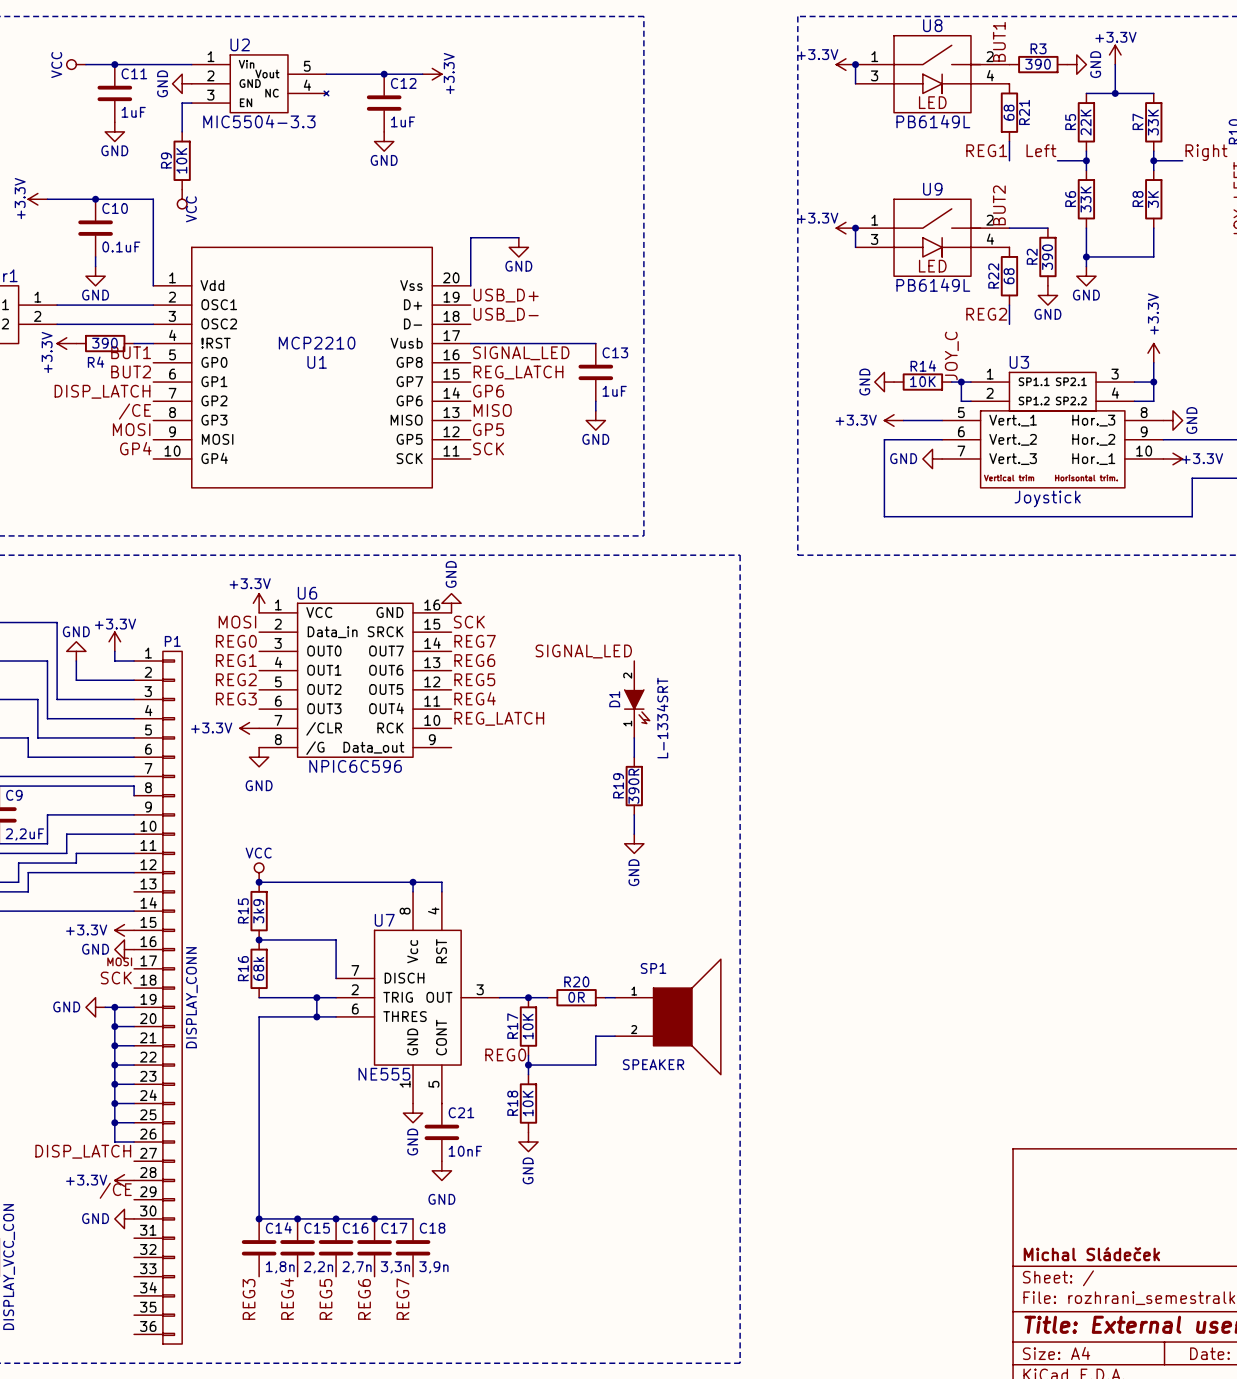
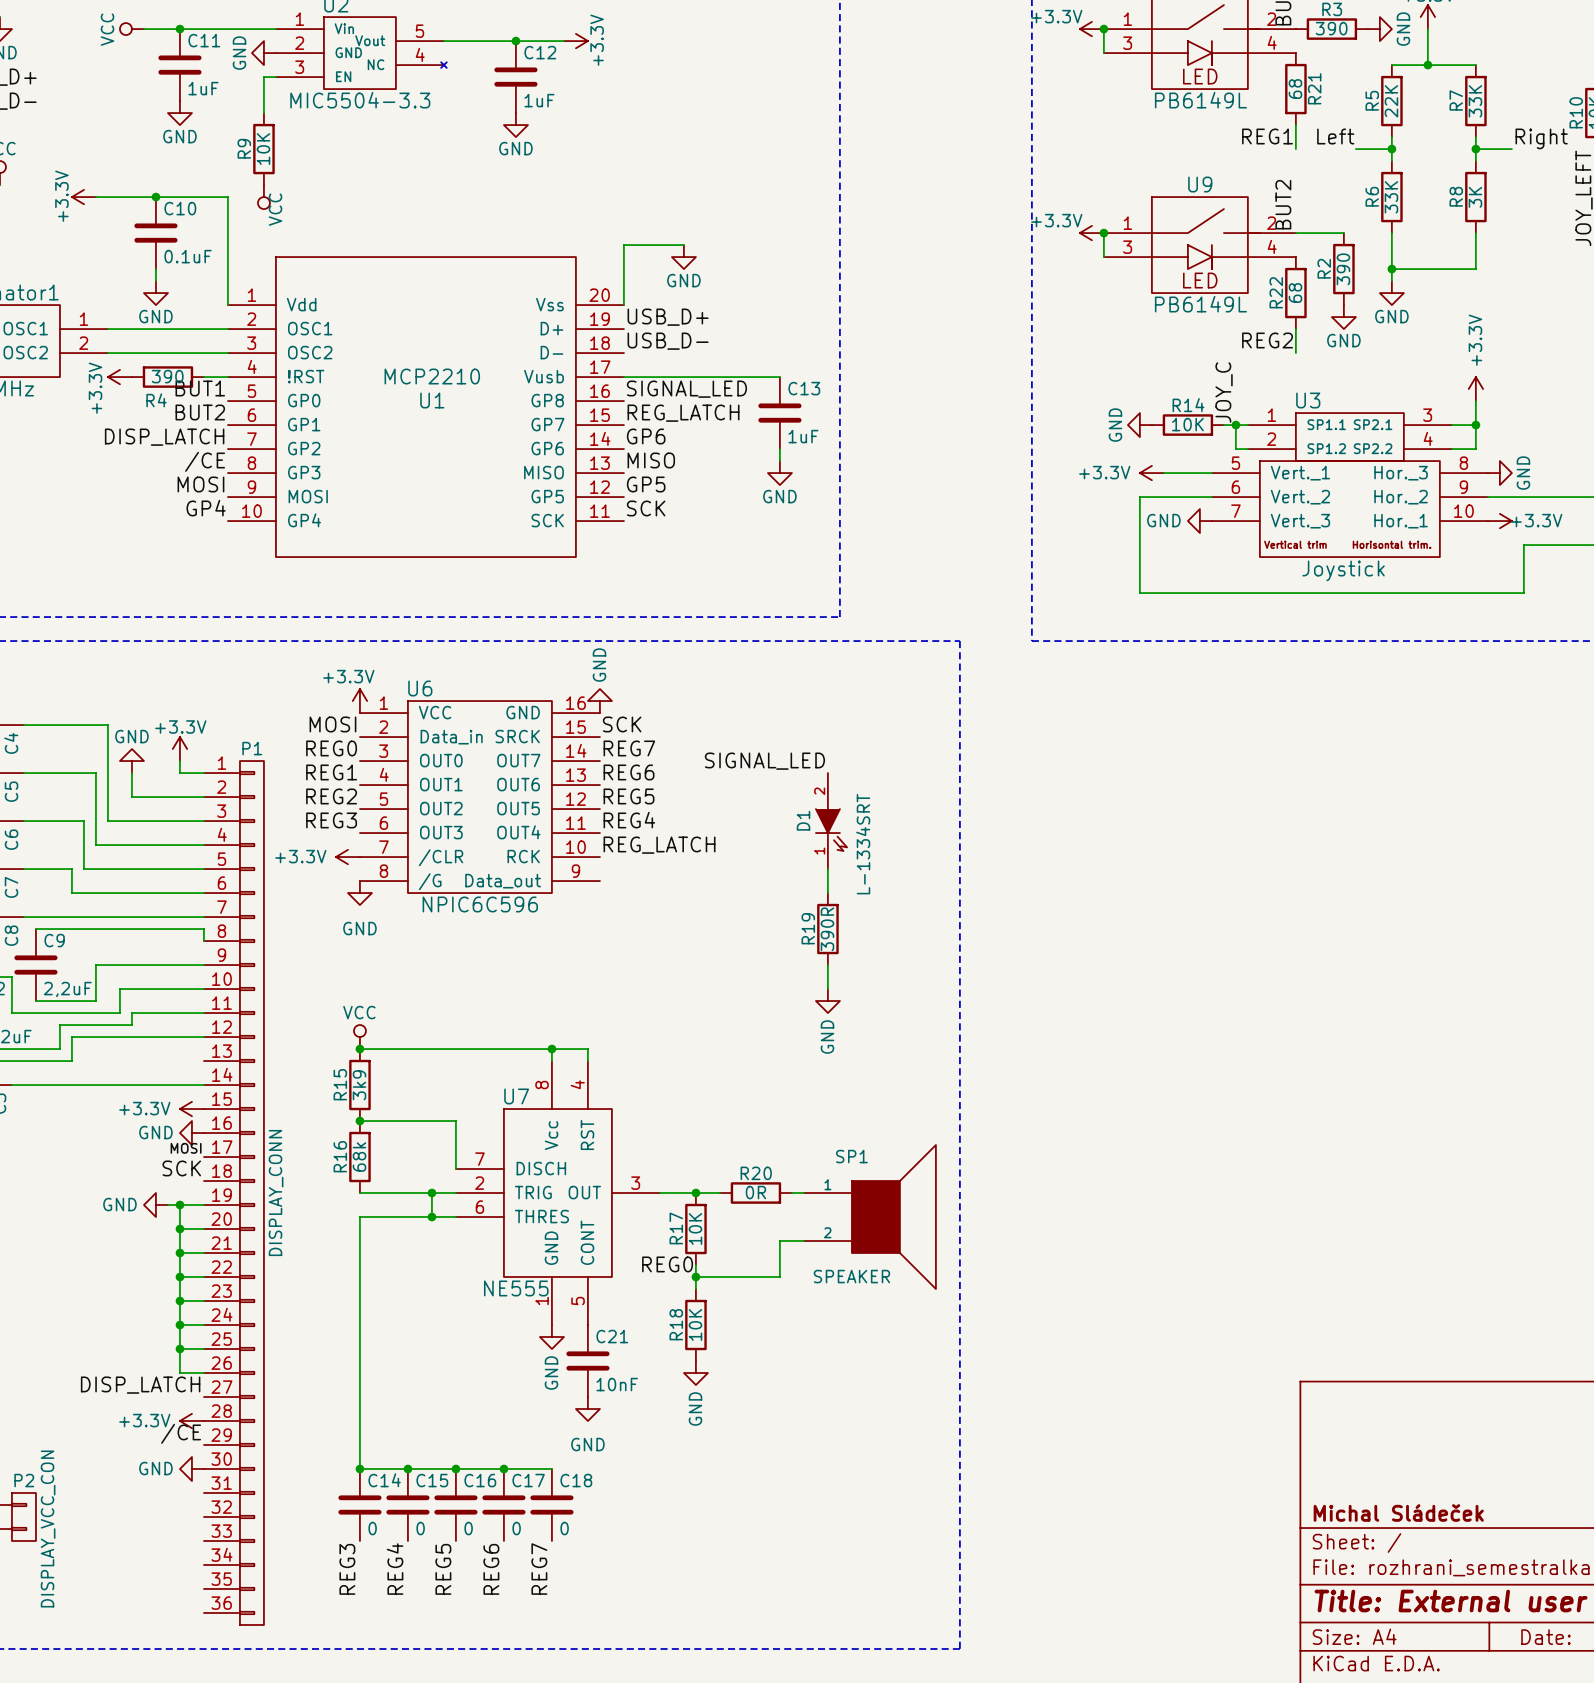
C14 value: 1,8n (280, 1267) -> 0 (372, 1528)
C15 value: 2,2n (318, 1267) -> 0 (420, 1528)
C16 value: 2,7n (356, 1267) -> 0 (468, 1528)
C17 value: 3,3n (395, 1267) -> 0 (516, 1528)
C18 value: 3,9n (433, 1267) -> 0 (564, 1528)

